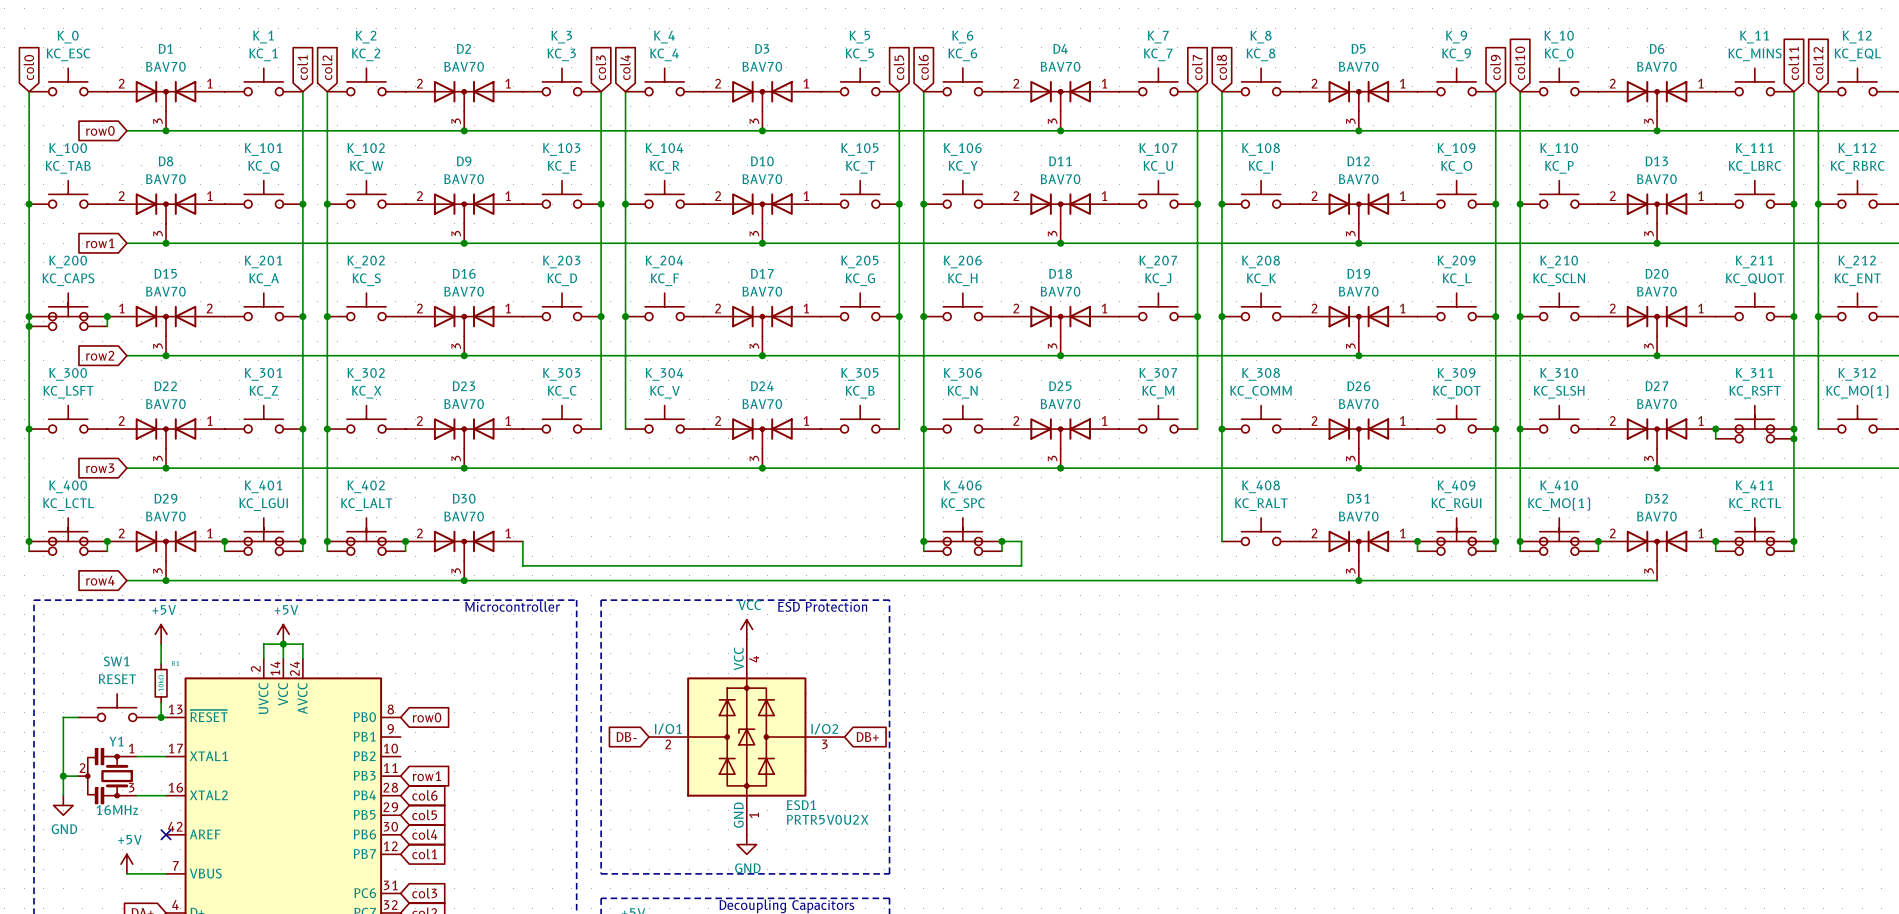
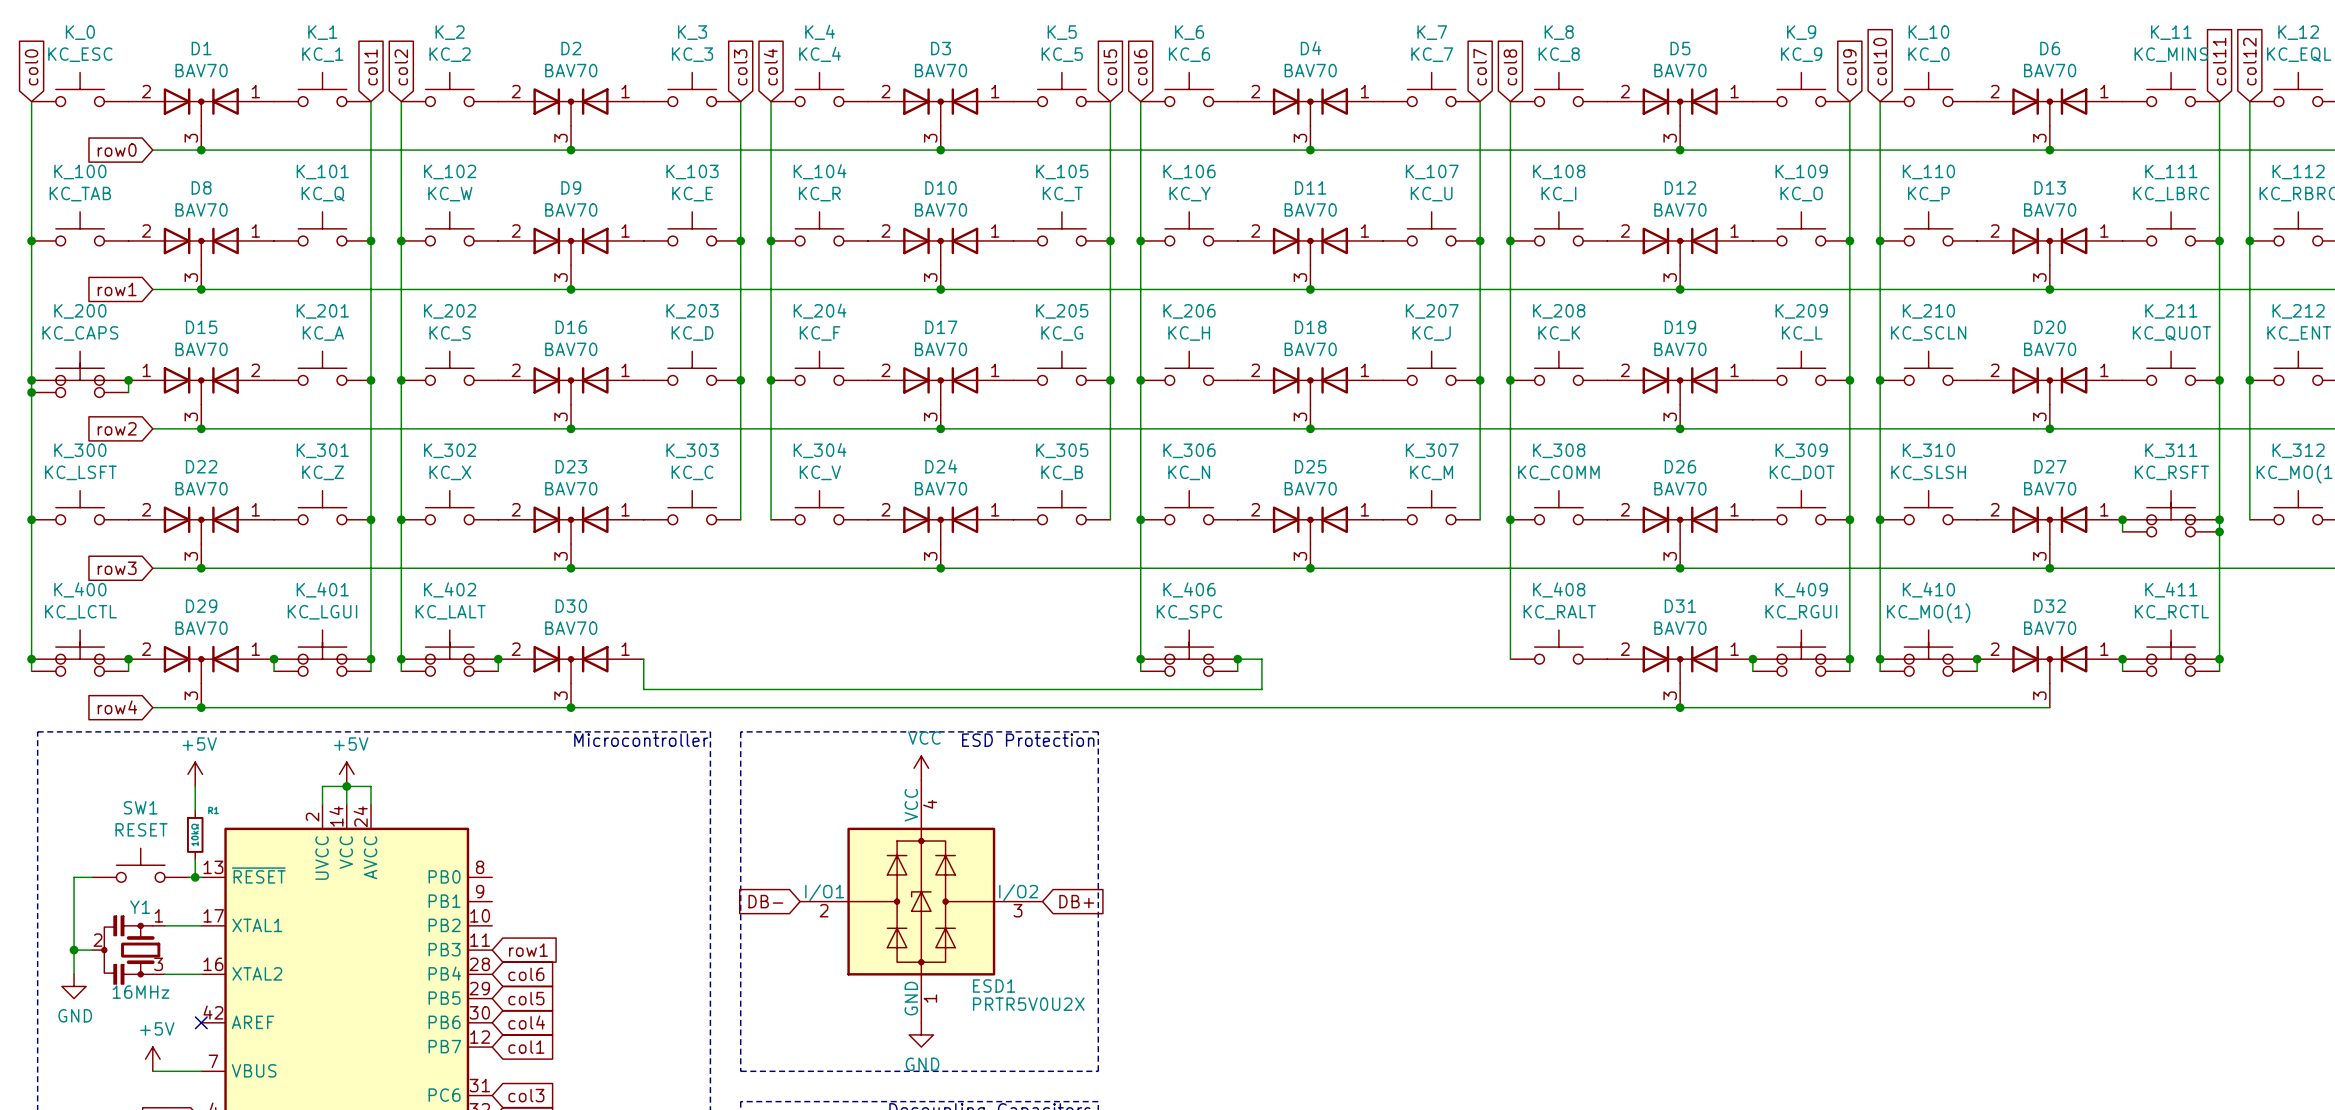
global label: row0 (427, 717) -> none

